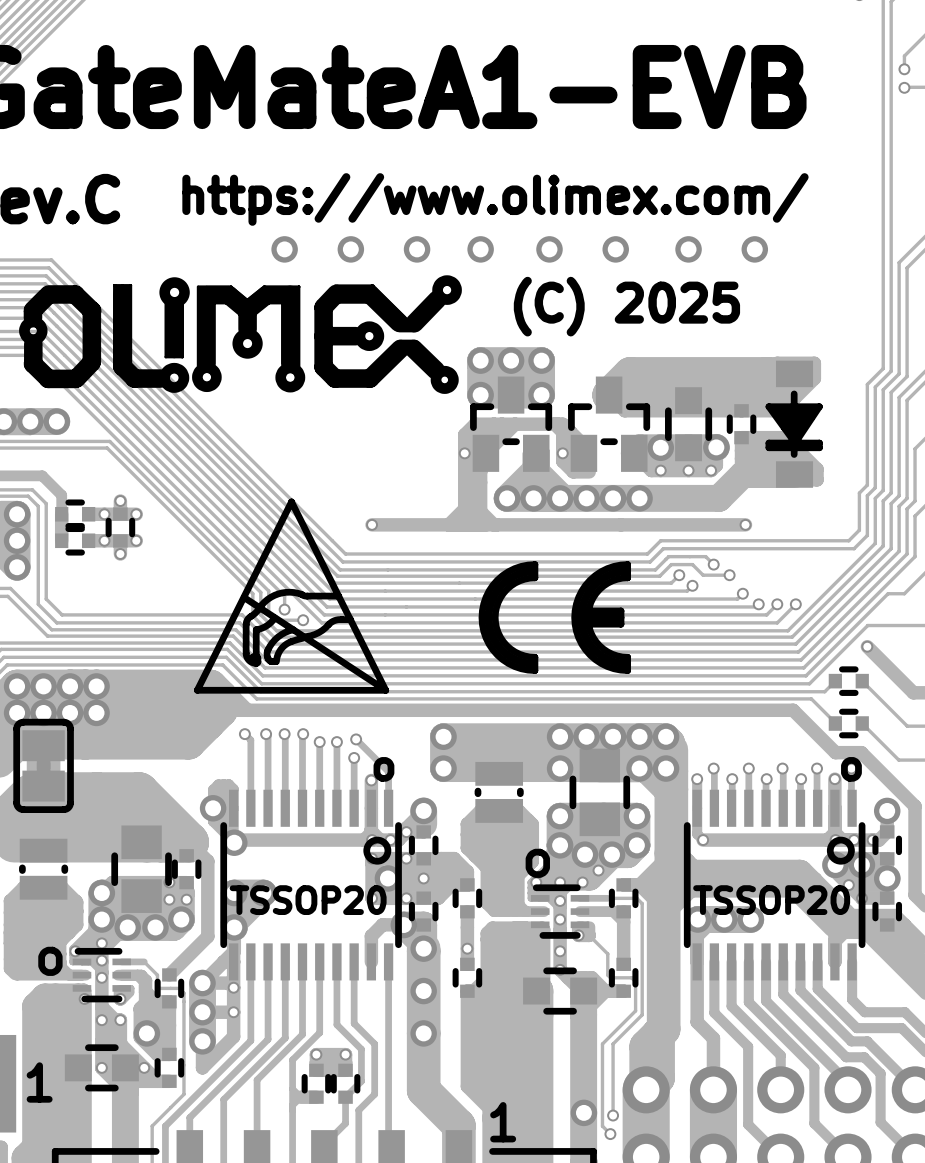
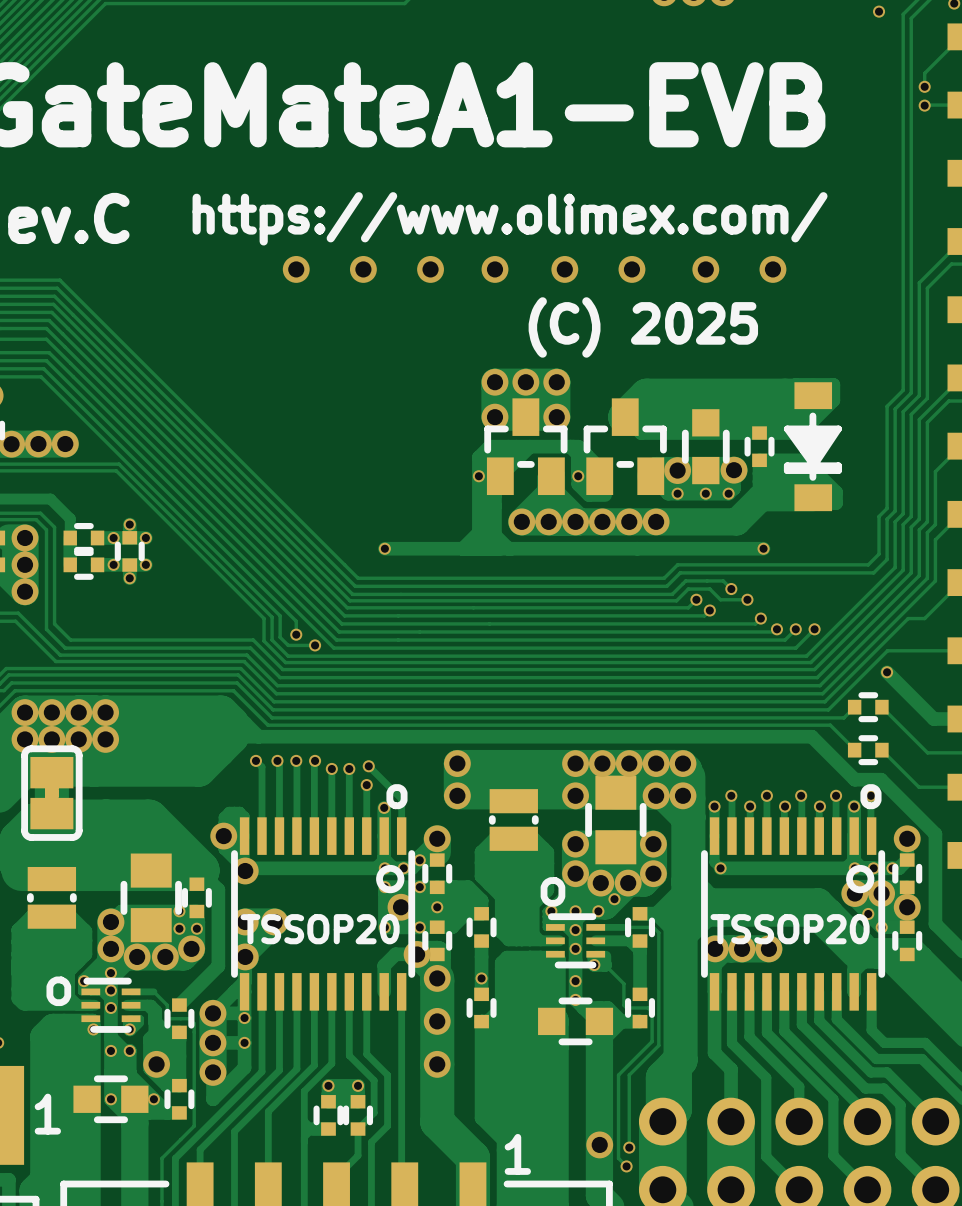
drawing: [19, 275, 462, 394] -> none
drawing: [194, 498, 390, 694] -> none
drawing: [478, 561, 632, 674] -> none

